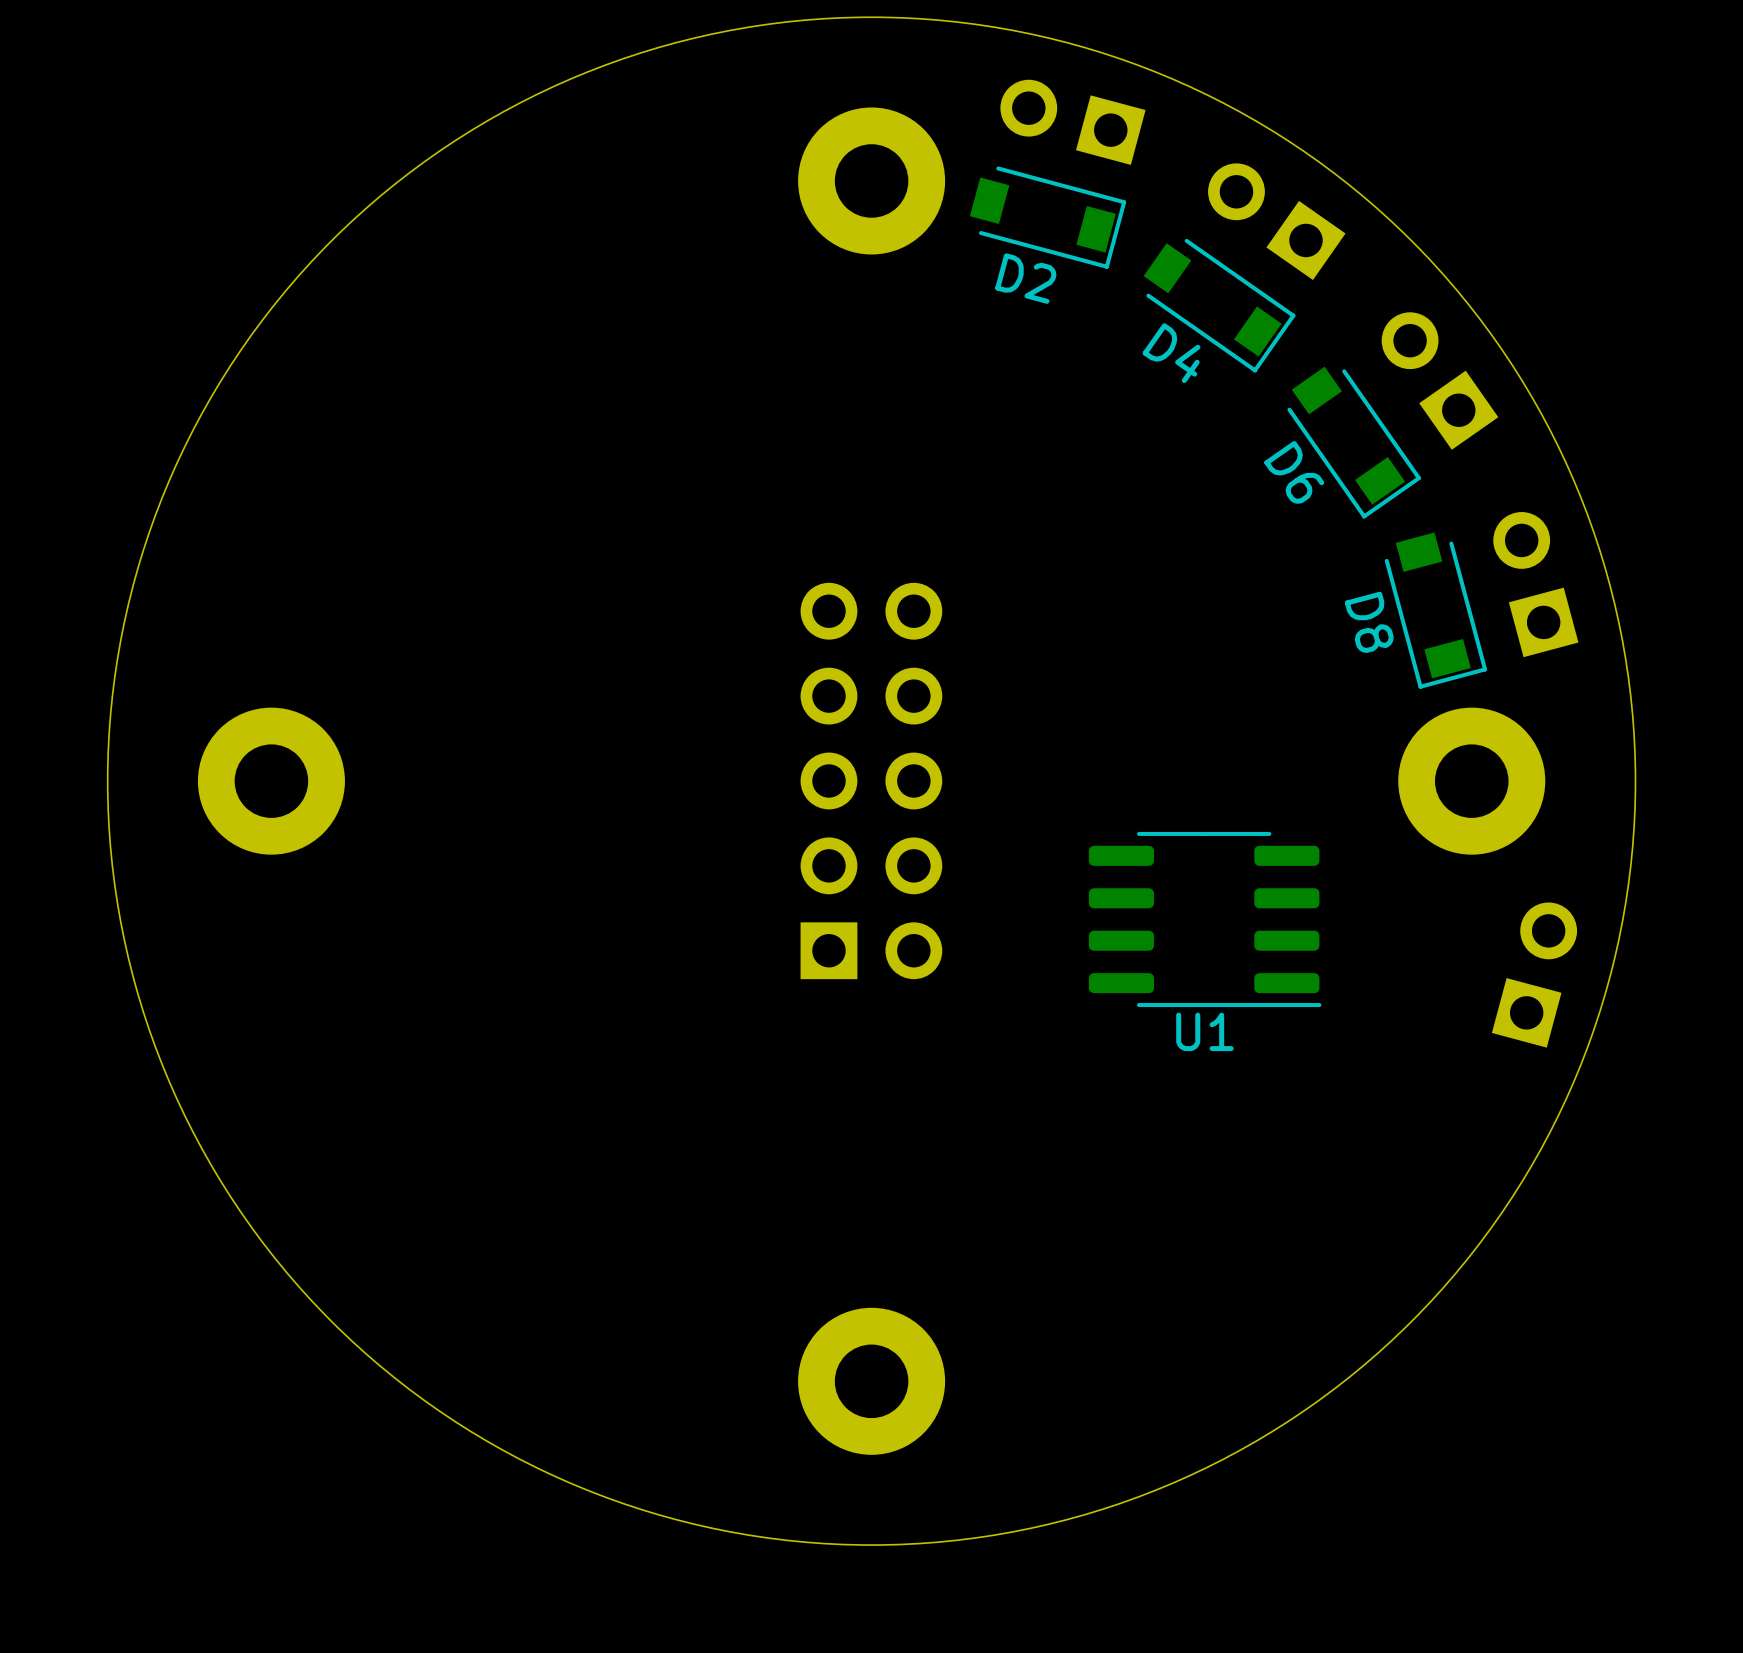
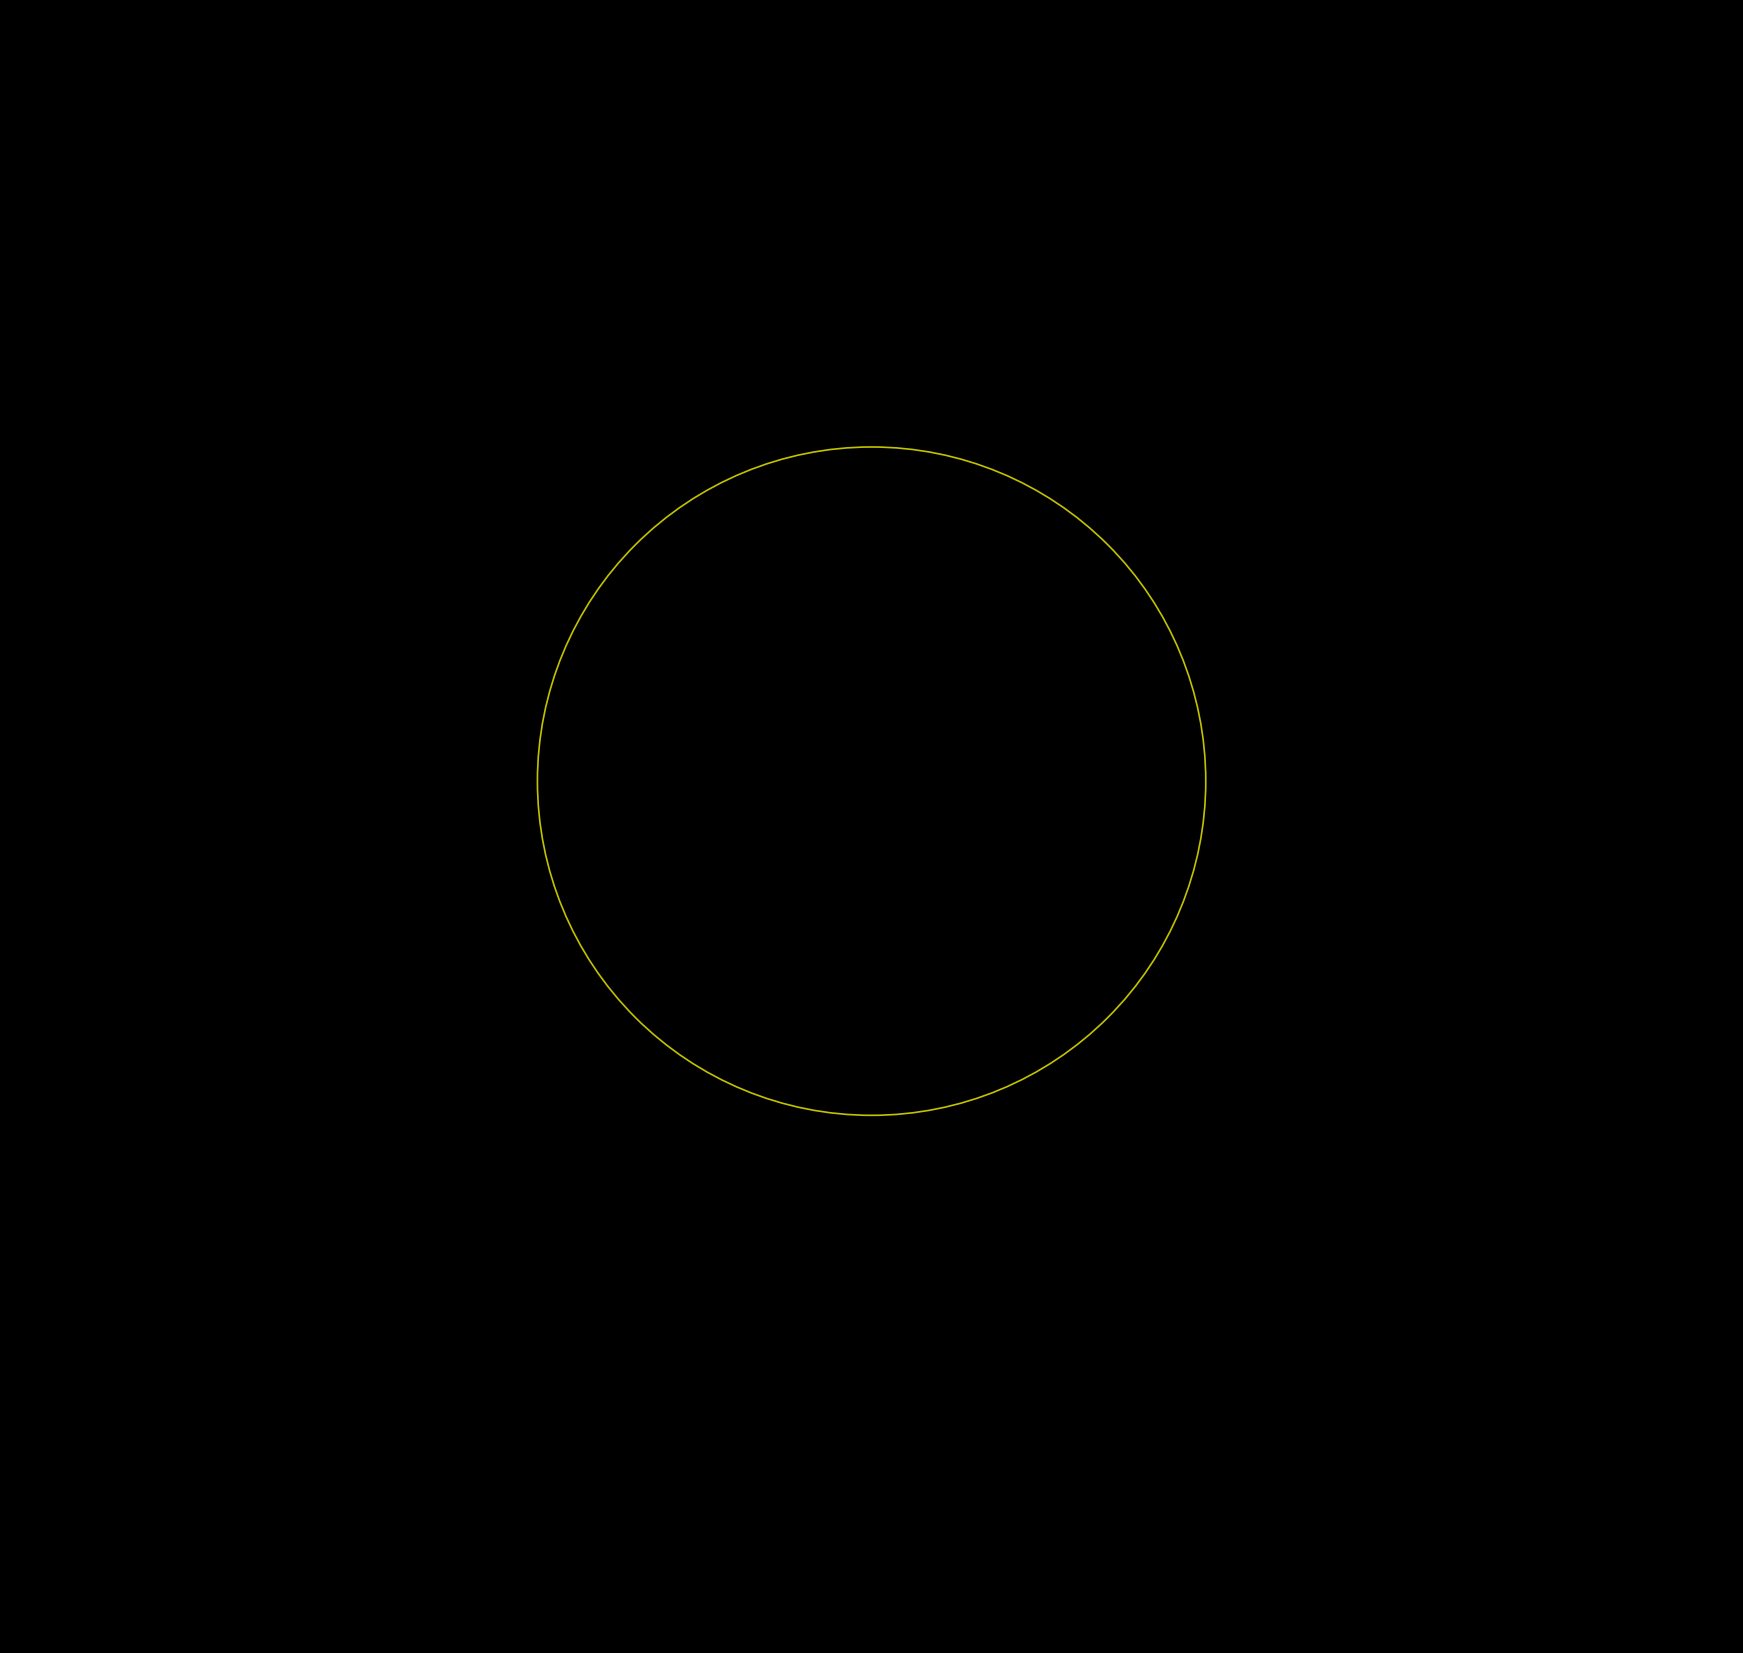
round board edge size: [106, 16, 1637, 1546] -> [536, 446, 1207, 1117]
part: (1072, 122) -> none
part: (871, 180) -> none
D2: (1048, 217) -> none
part: (1276, 221) -> none
D4: (1219, 305) -> none
part: (1440, 381) -> none
D6: (1354, 442) -> none
part: (1535, 584) -> none
D8: (1435, 610) -> none
part: (871, 780) -> none
part: (271, 781) -> none
part: (1471, 781) -> none
U1: (1205, 919) -> none
part: (1534, 975) -> none
part: (871, 1381) -> none

